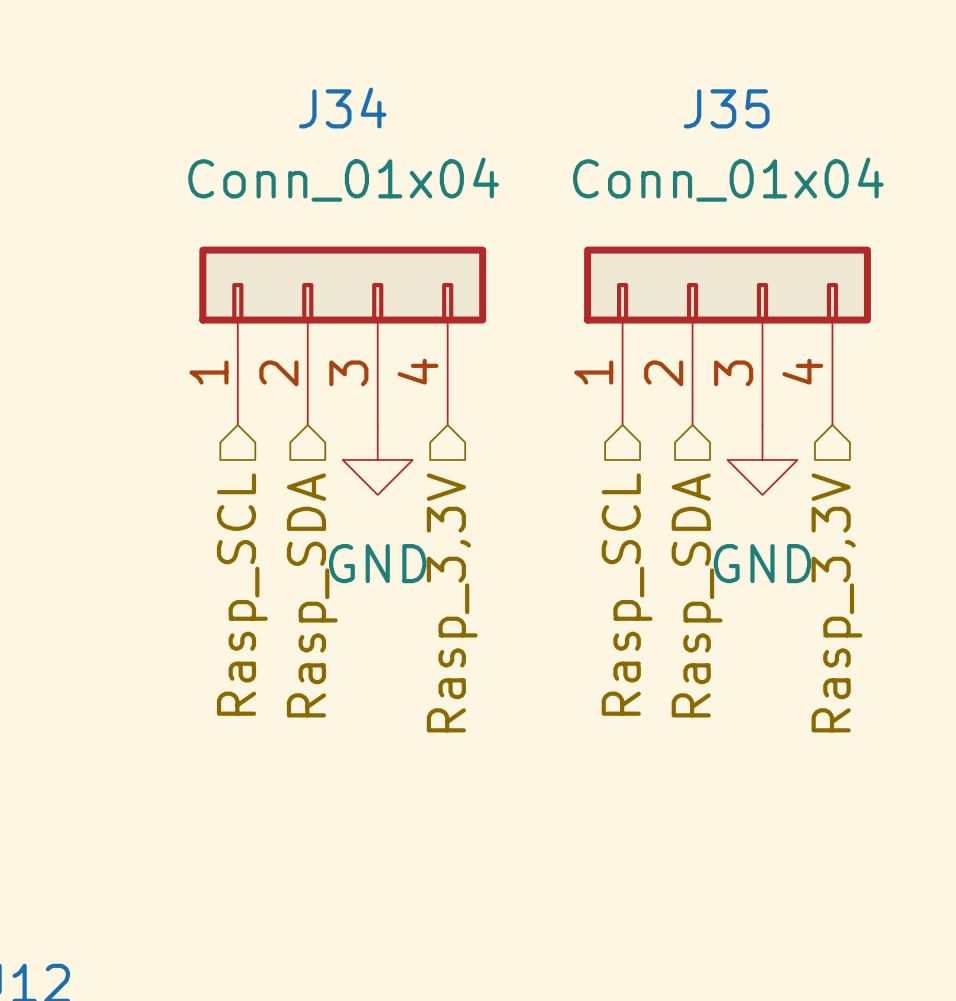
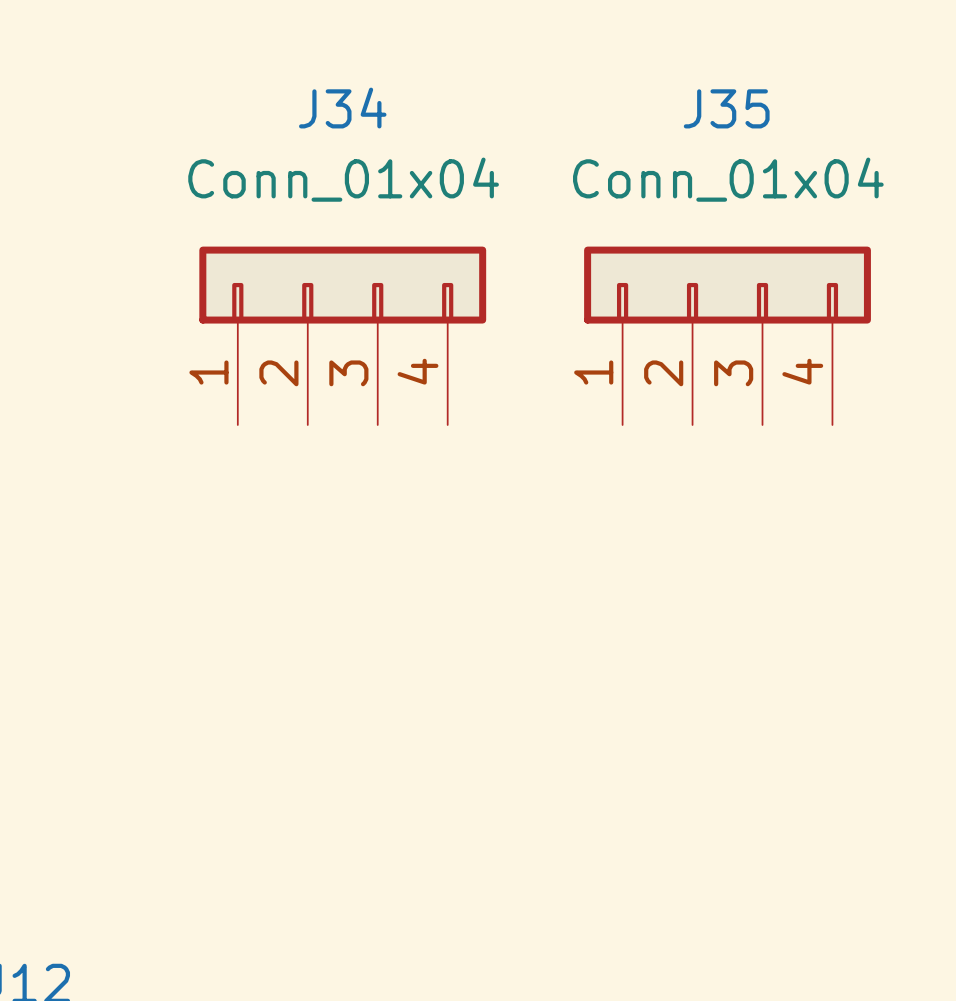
power symbol: GND (377, 459) -> none
power symbol: GND (762, 459) -> none
hierarchical label: Rasp_SCL (242, 594) -> none
hierarchical label: Rasp_SCL (627, 594) -> none
hierarchical label: Rasp_SDA (312, 595) -> none
hierarchical label: Rasp_SDA (697, 595) -> none
hierarchical label: Rasp_3,3V (452, 602) -> none
hierarchical label: Rasp_3,3V (836, 602) -> none

